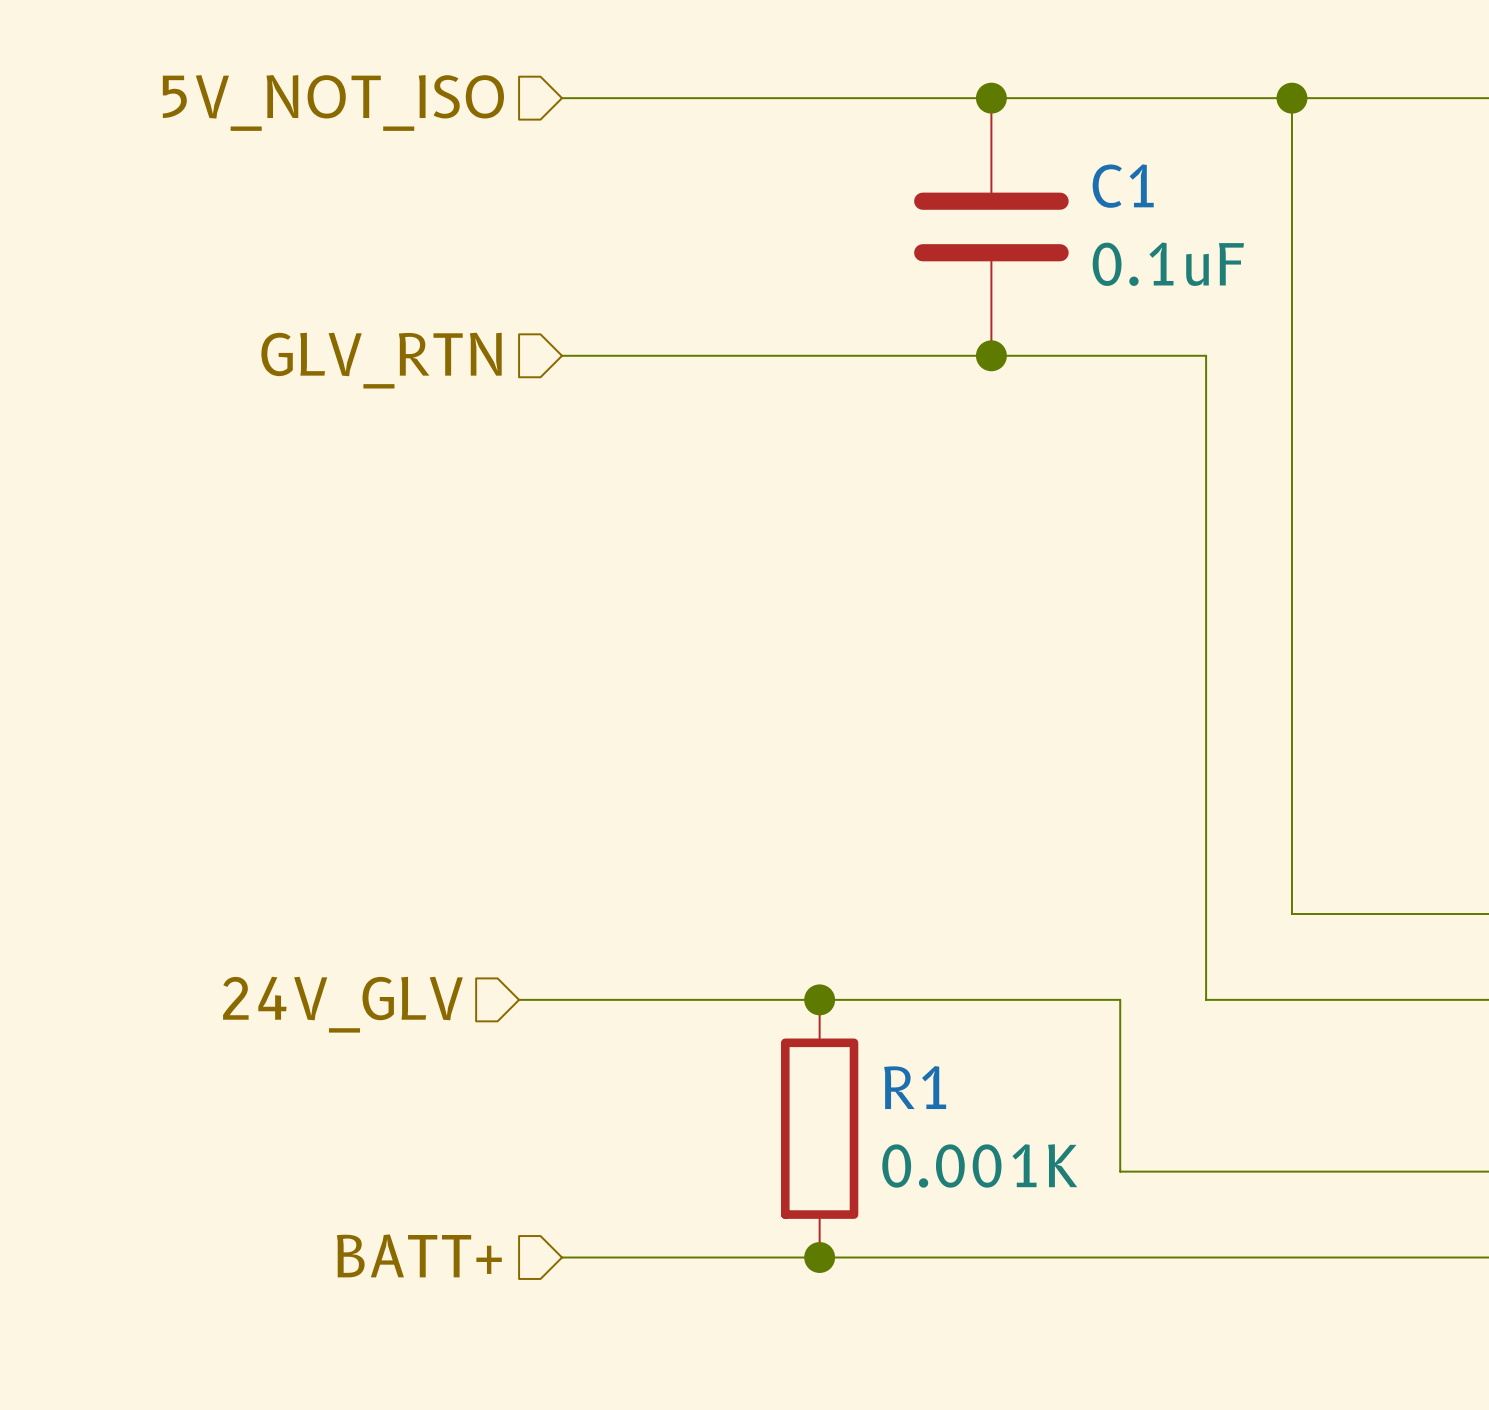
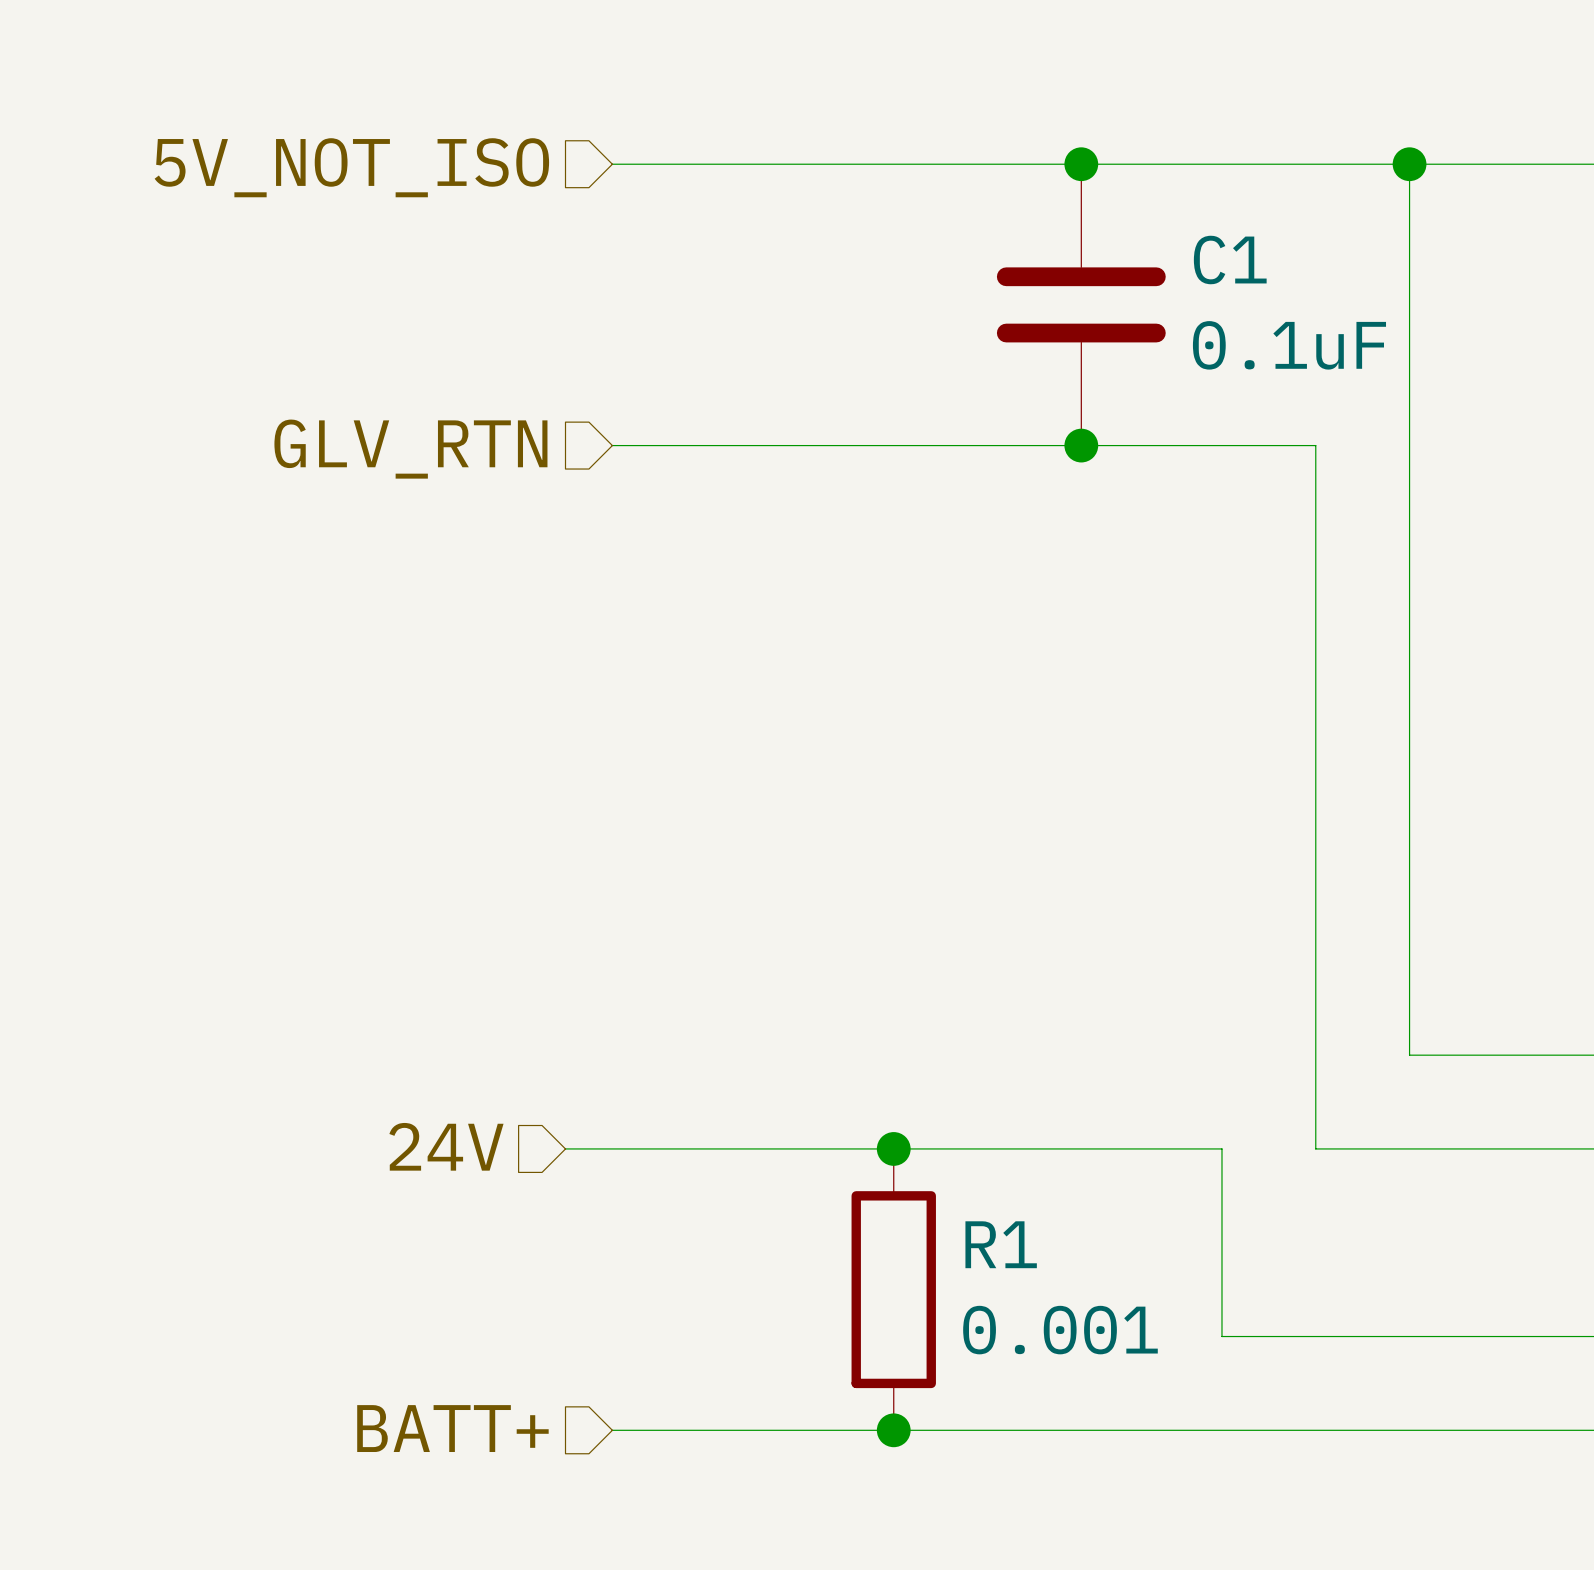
hierarchical label: 24V_GLV (342, 1004) -> 24V (446, 1146)
R1 value: 0.001K (979, 1165) -> 0.001 (1060, 1330)

